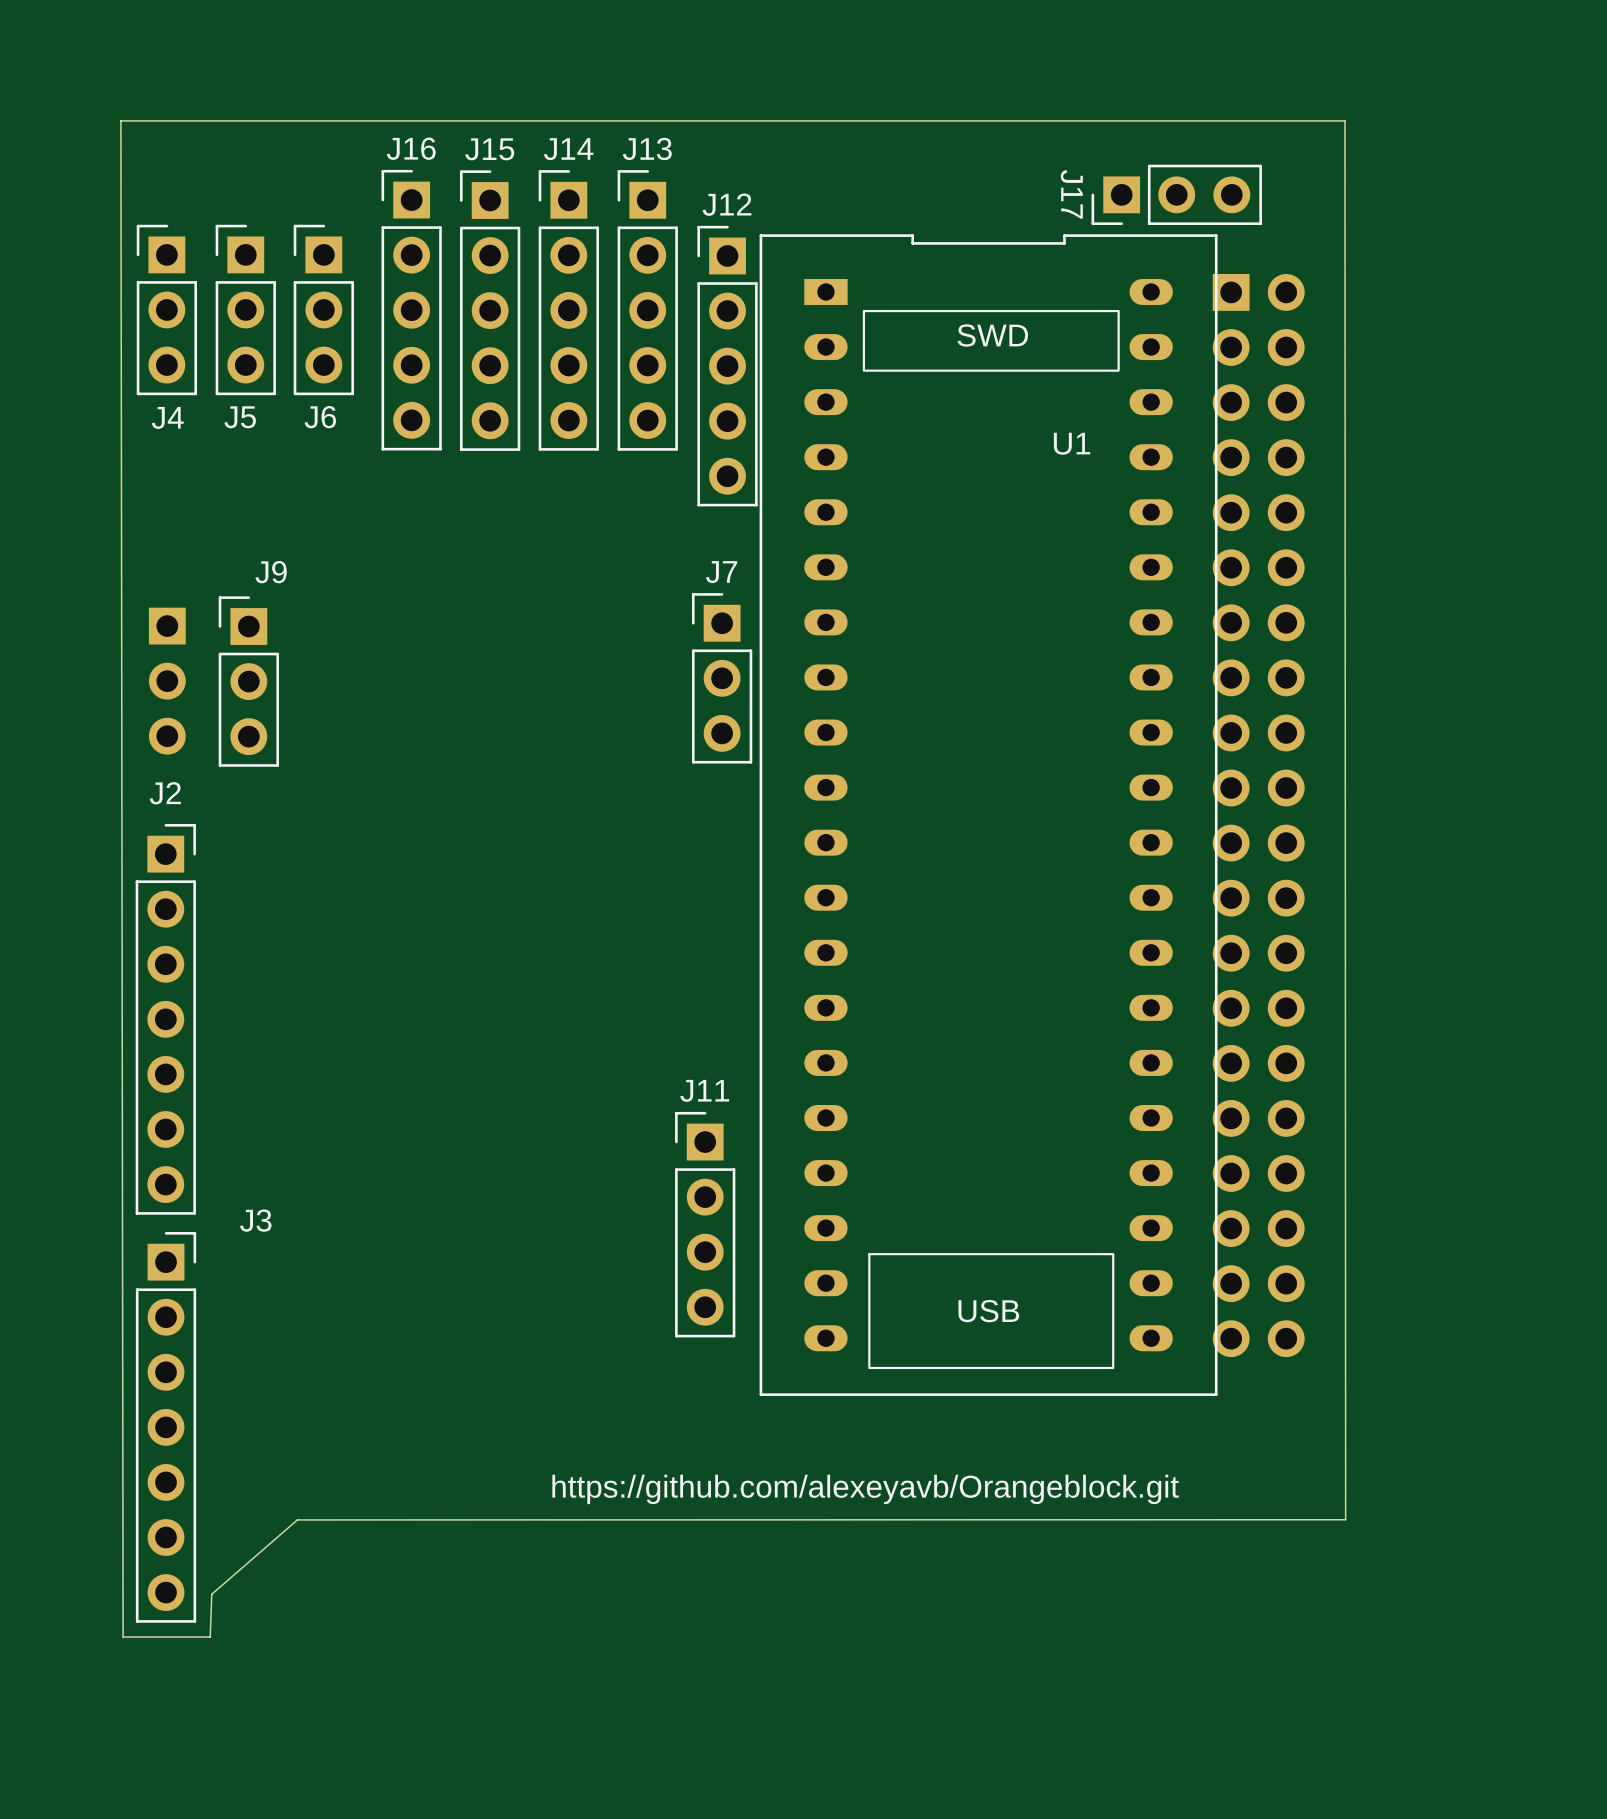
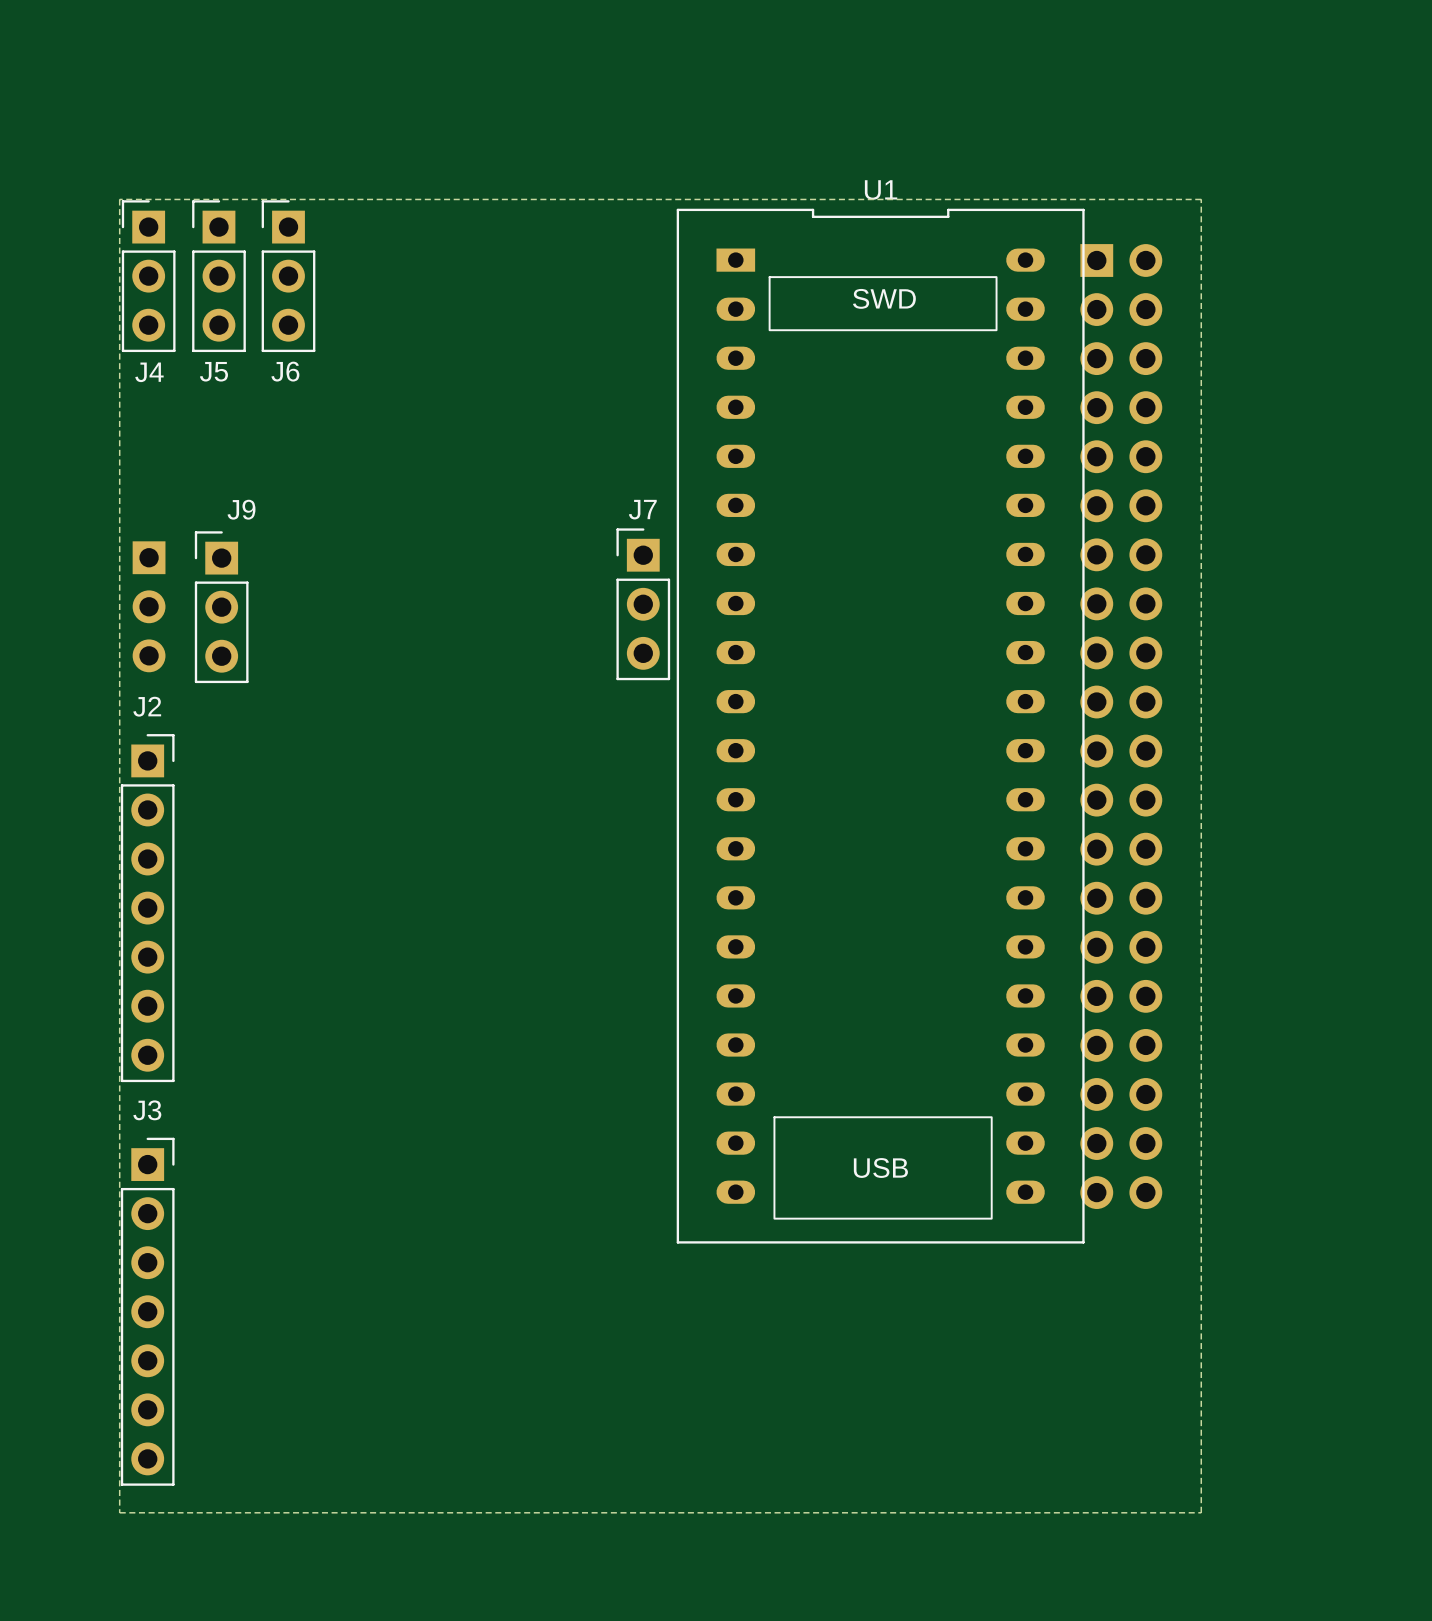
board edge: (1344, 120) (120, 120) (123, 1637) (210, 1637) (211, 1594) (297, 1519) (1345, 1519) (1344, 120) -> (1201, 199) (1201, 1512) (119, 1512) (119, 199) (1201, 199)
J17: (1176, 194) -> none
J16: (411, 310) -> none
J15: (490, 310) -> none
J14: (568, 310) -> none
J13: (647, 310) -> none
J12: (727, 366) -> none
U1 name position: U1 (1072, 443) -> U1 (881, 190)
J3 name position: J3 (255, 1220) -> J3 (147, 1110)
J11: (705, 1224) -> none
J3 position: (166, 1427) -> (147, 1311)
text: https://github.com/alexeyavb/Orangeblock.git (865, 1489) -> none

